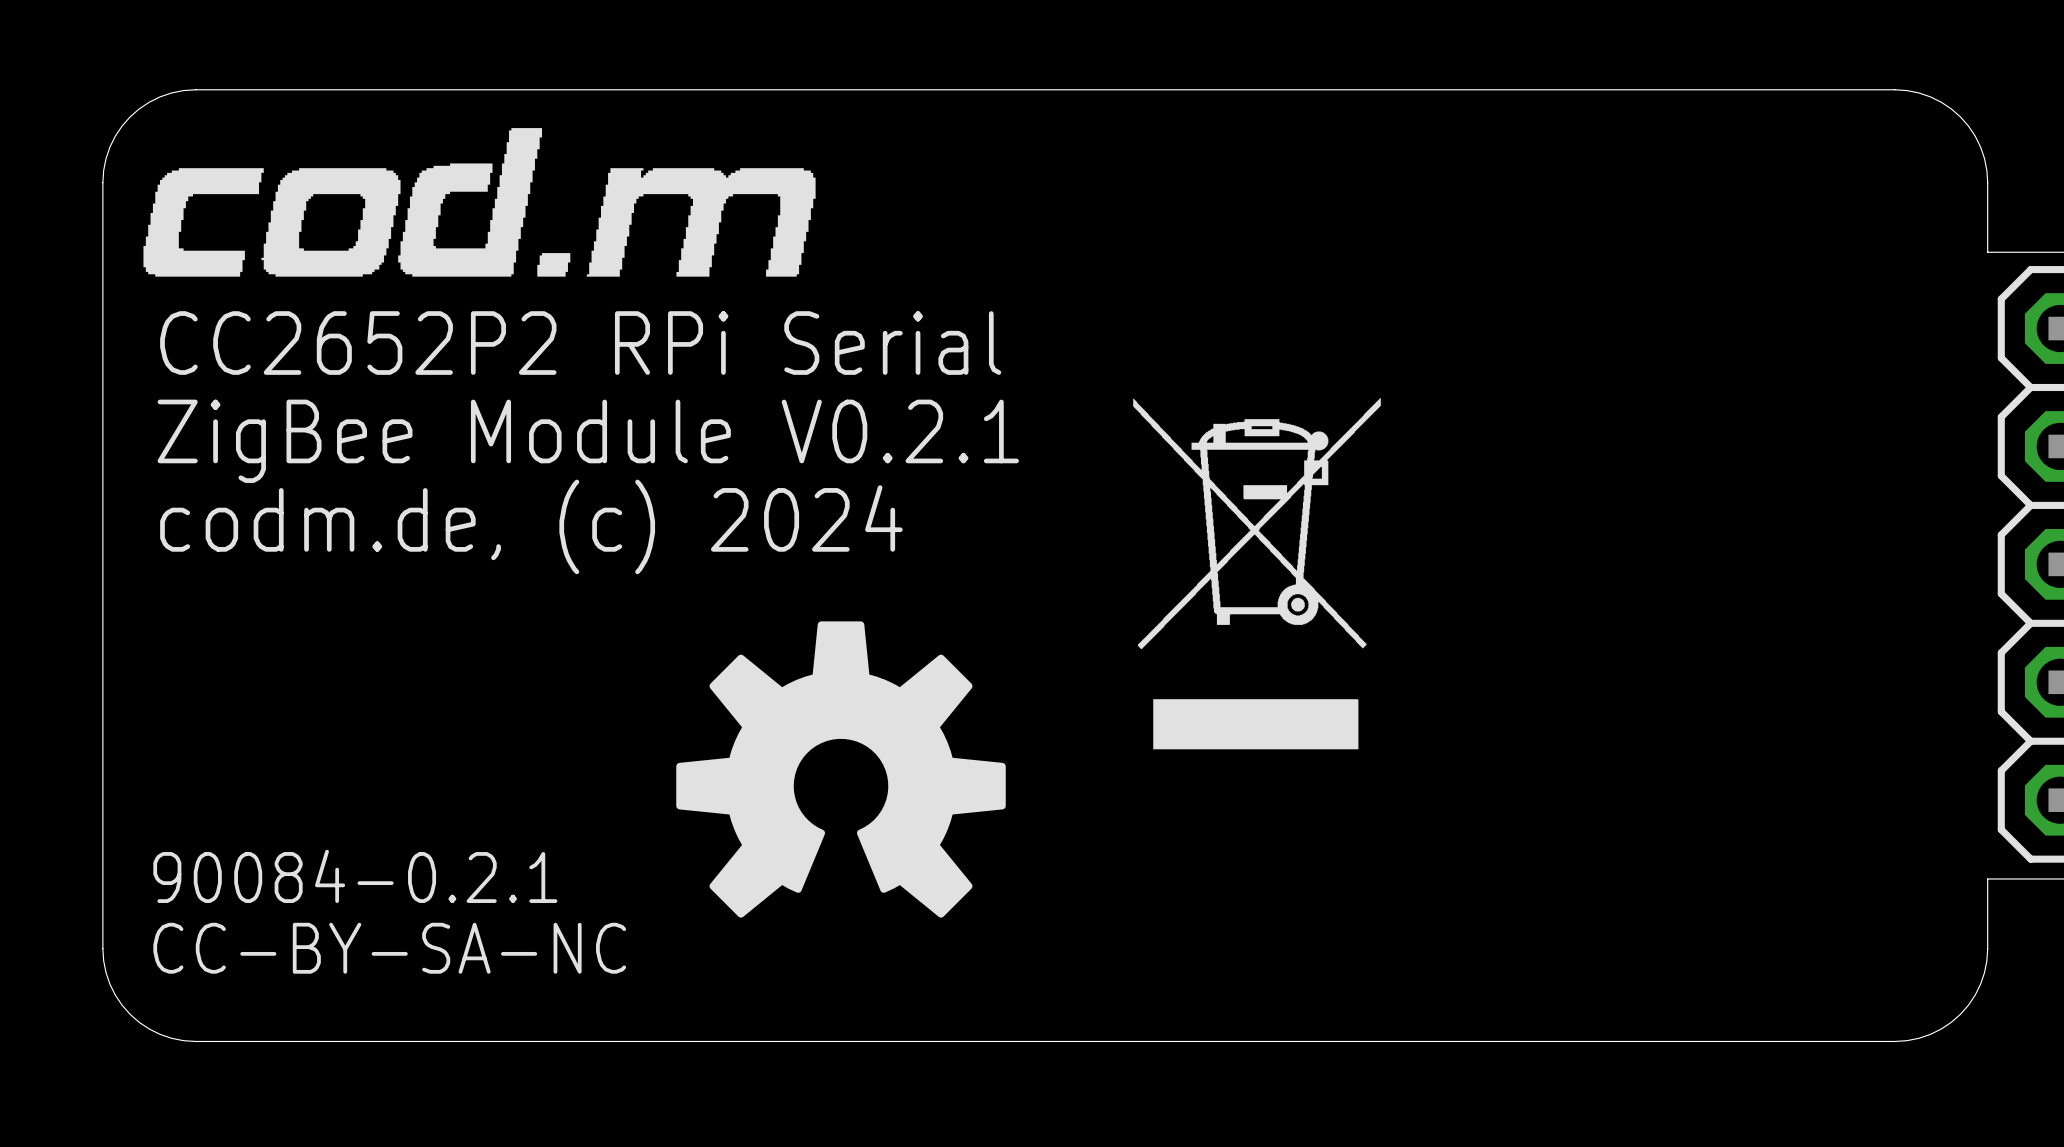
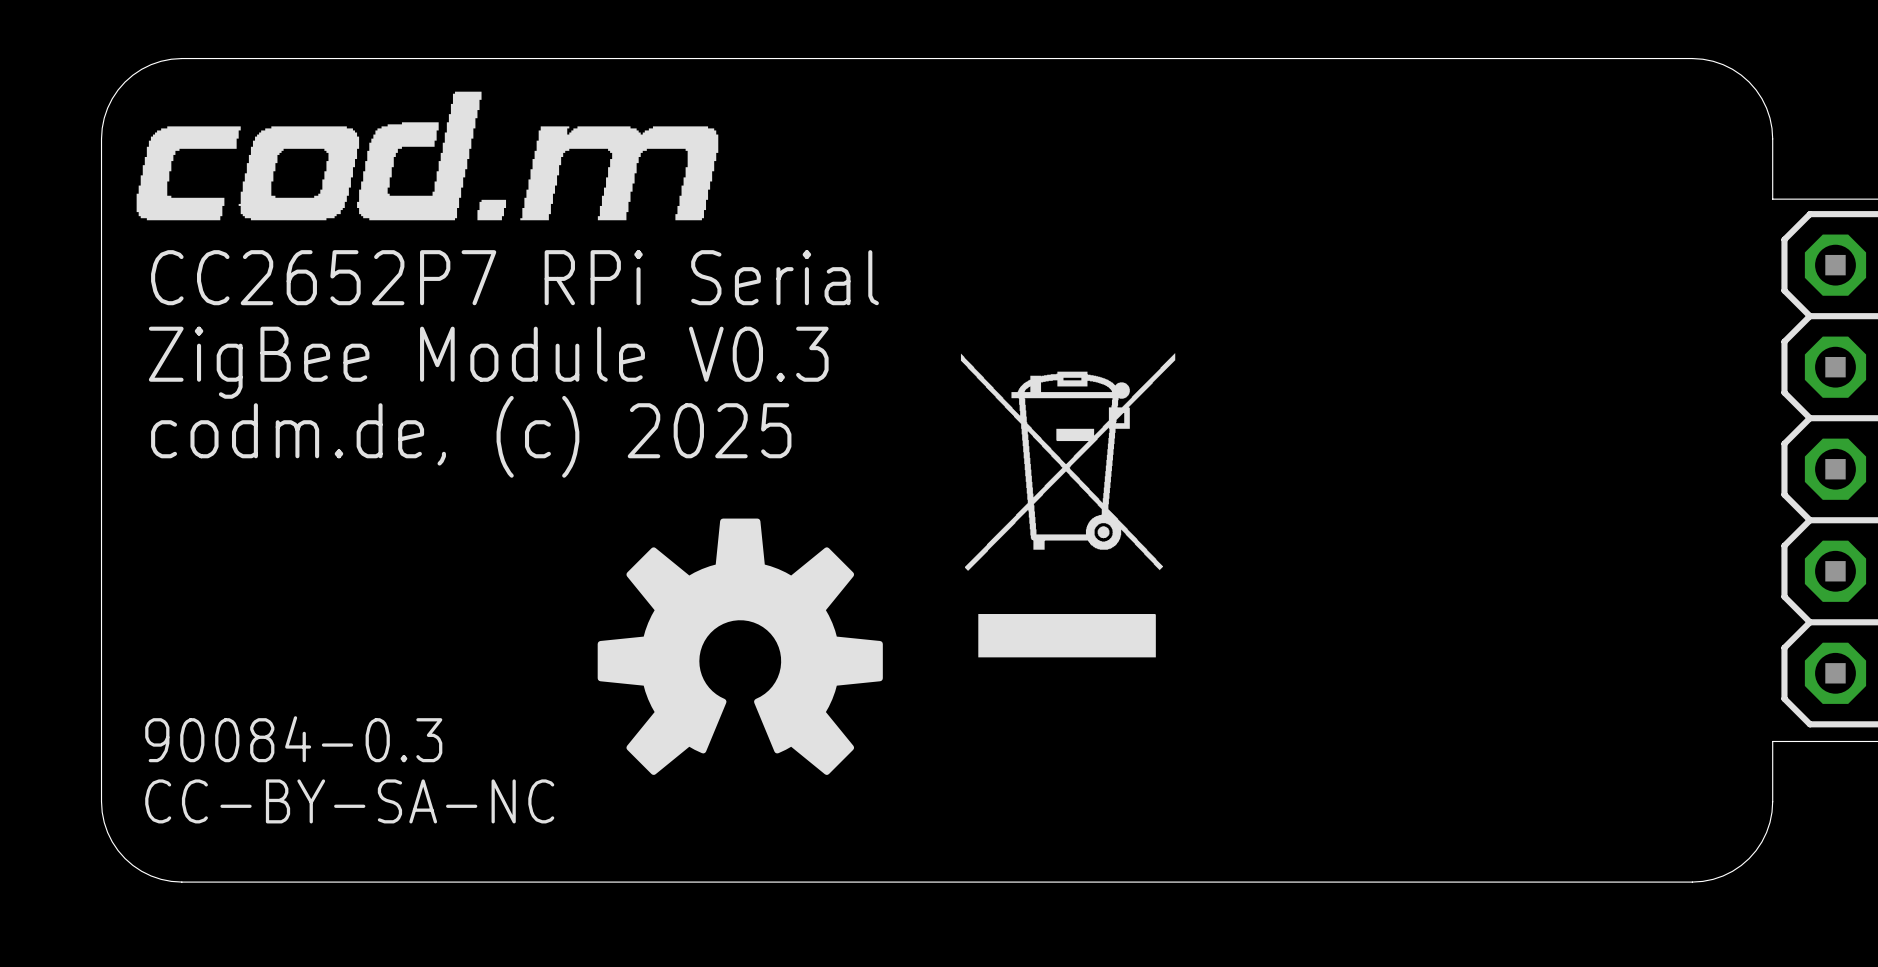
board edge: (195, 89) (171, 92) (160, 96) (149, 102) (130, 116) (115, 136) (109, 147) (106, 158) (102, 182) (103, 960) (109, 984) (115, 995) (130, 1014) (139, 1022) (160, 1034) (171, 1038) (195, 1041) -> (222, 58) (171, 59) (141, 69) (125, 82) (112, 98) (104, 118) (101, 138) (102, 812) (112, 841) (125, 858) (141, 871) (171, 881) (222, 882)
drawing position: (479, 202) -> (427, 155)
text: CC2652P2 RPi Serial (580, 343) -> CC2652P7 RPi Serial (514, 277)
text: ZigBee Module V0.2.1 (588, 441) -> ZigBee Module V0.3 (488, 362)
text: codm.de, (c) 2024 (531, 526) -> codm.de, (c) 2025 (471, 436)
drawing position: (1257, 573) -> (1068, 505)
drawing position: (841, 769) -> (740, 646)
text: 90084-0.2.1 (355, 876) -> 90084-0.3 (293, 739)
text position: CC-BY-SA-NC (389, 948) -> CC-BY-SA-NC (349, 801)

